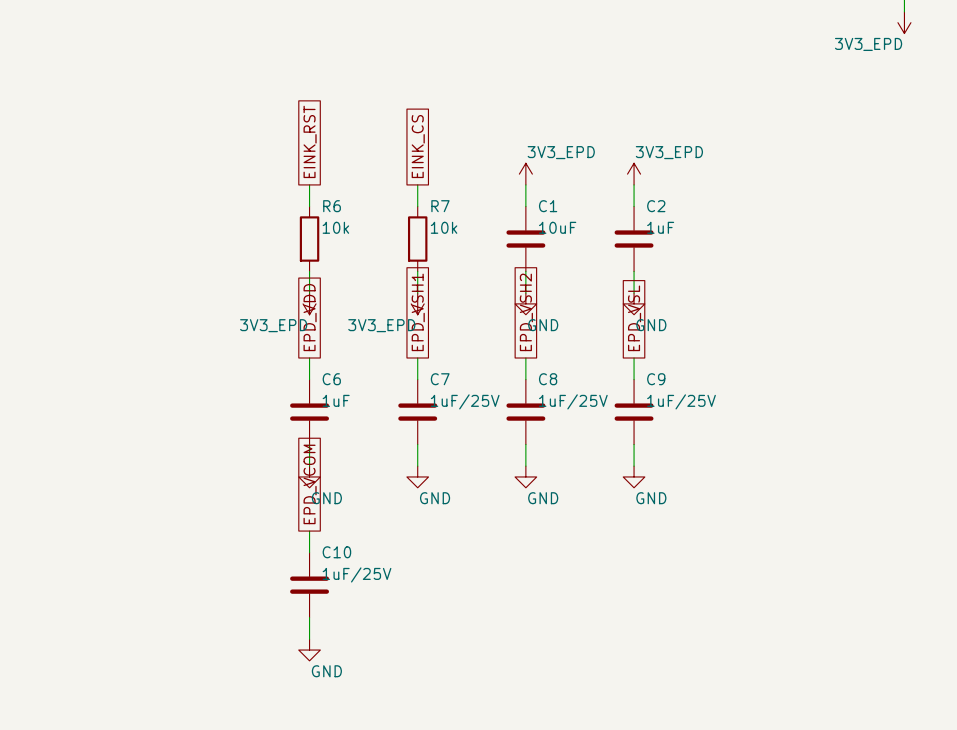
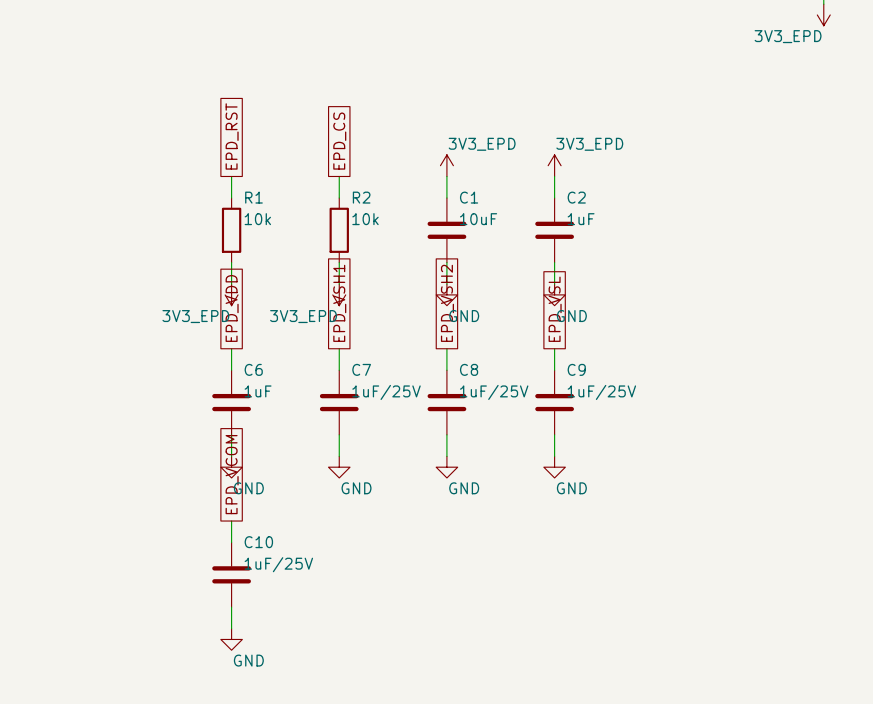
global label: EINK_RST (310, 141) -> EPD_RST (232, 136)
global label: EINK_CS (418, 146) -> EPD_CS (339, 141)
R6 name: R6 (332, 206) -> R1 (253, 197)
R7 name: R7 (440, 206) -> R2 (361, 197)

